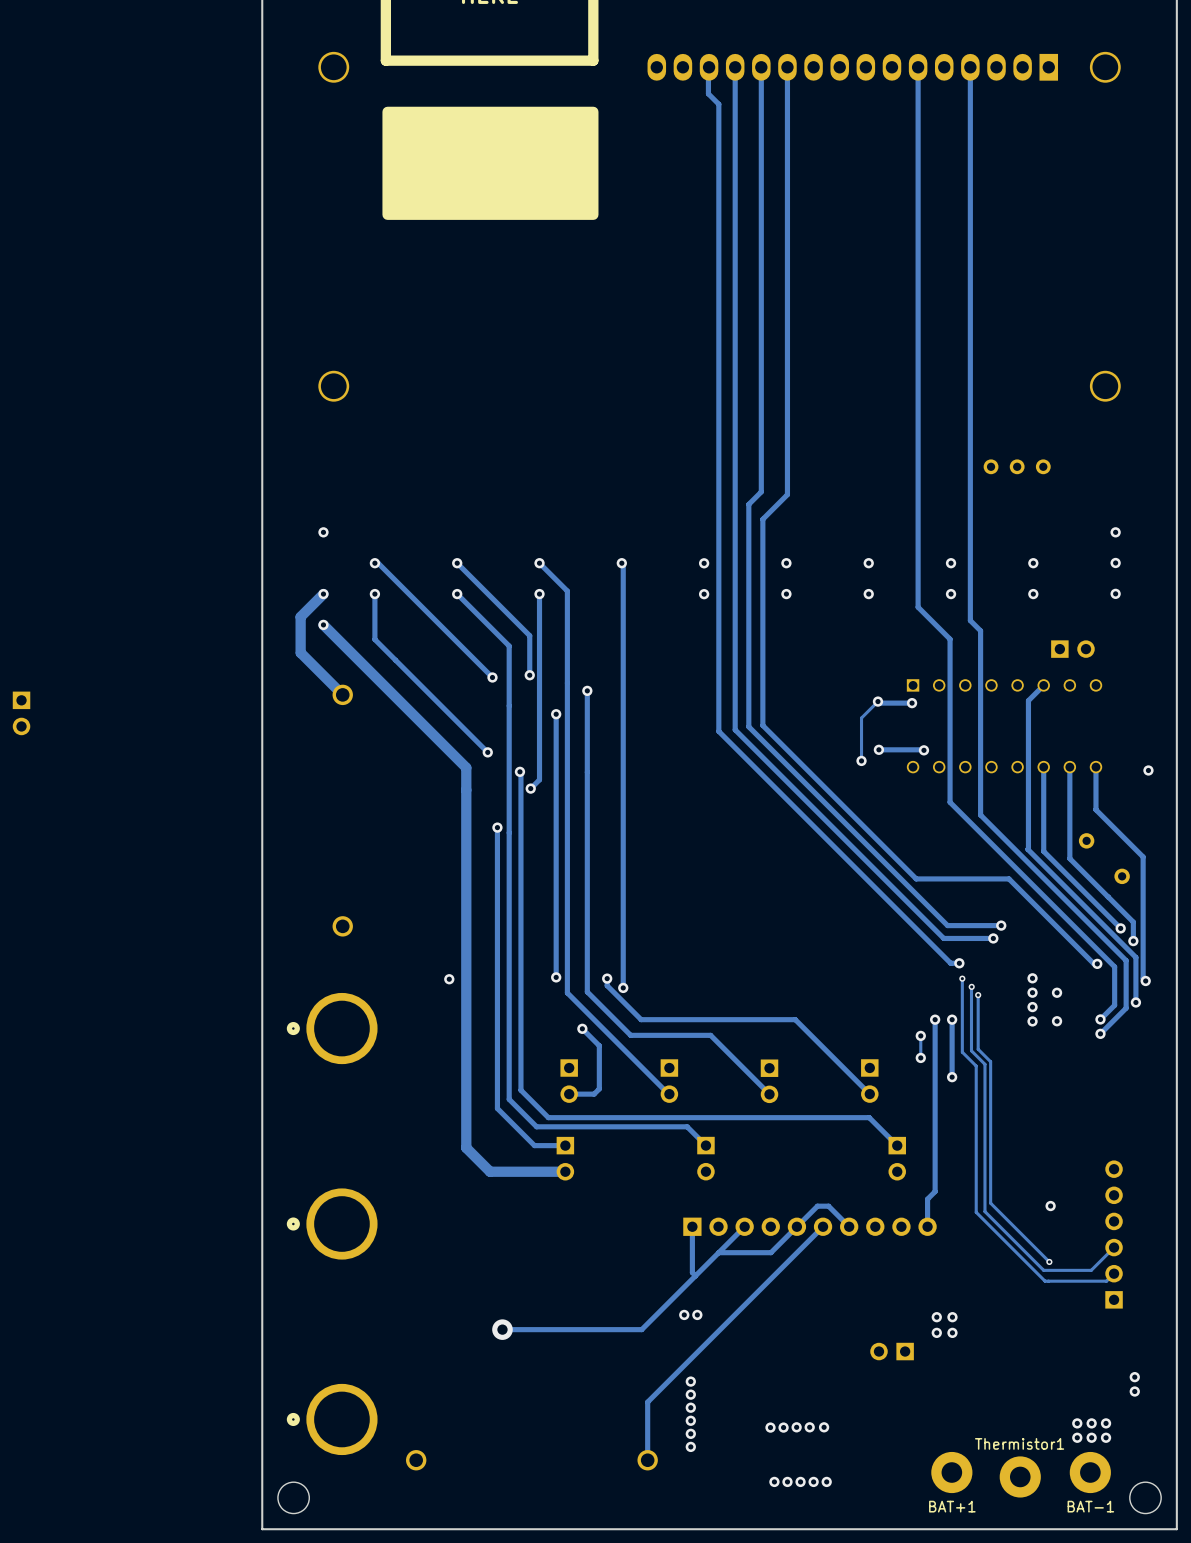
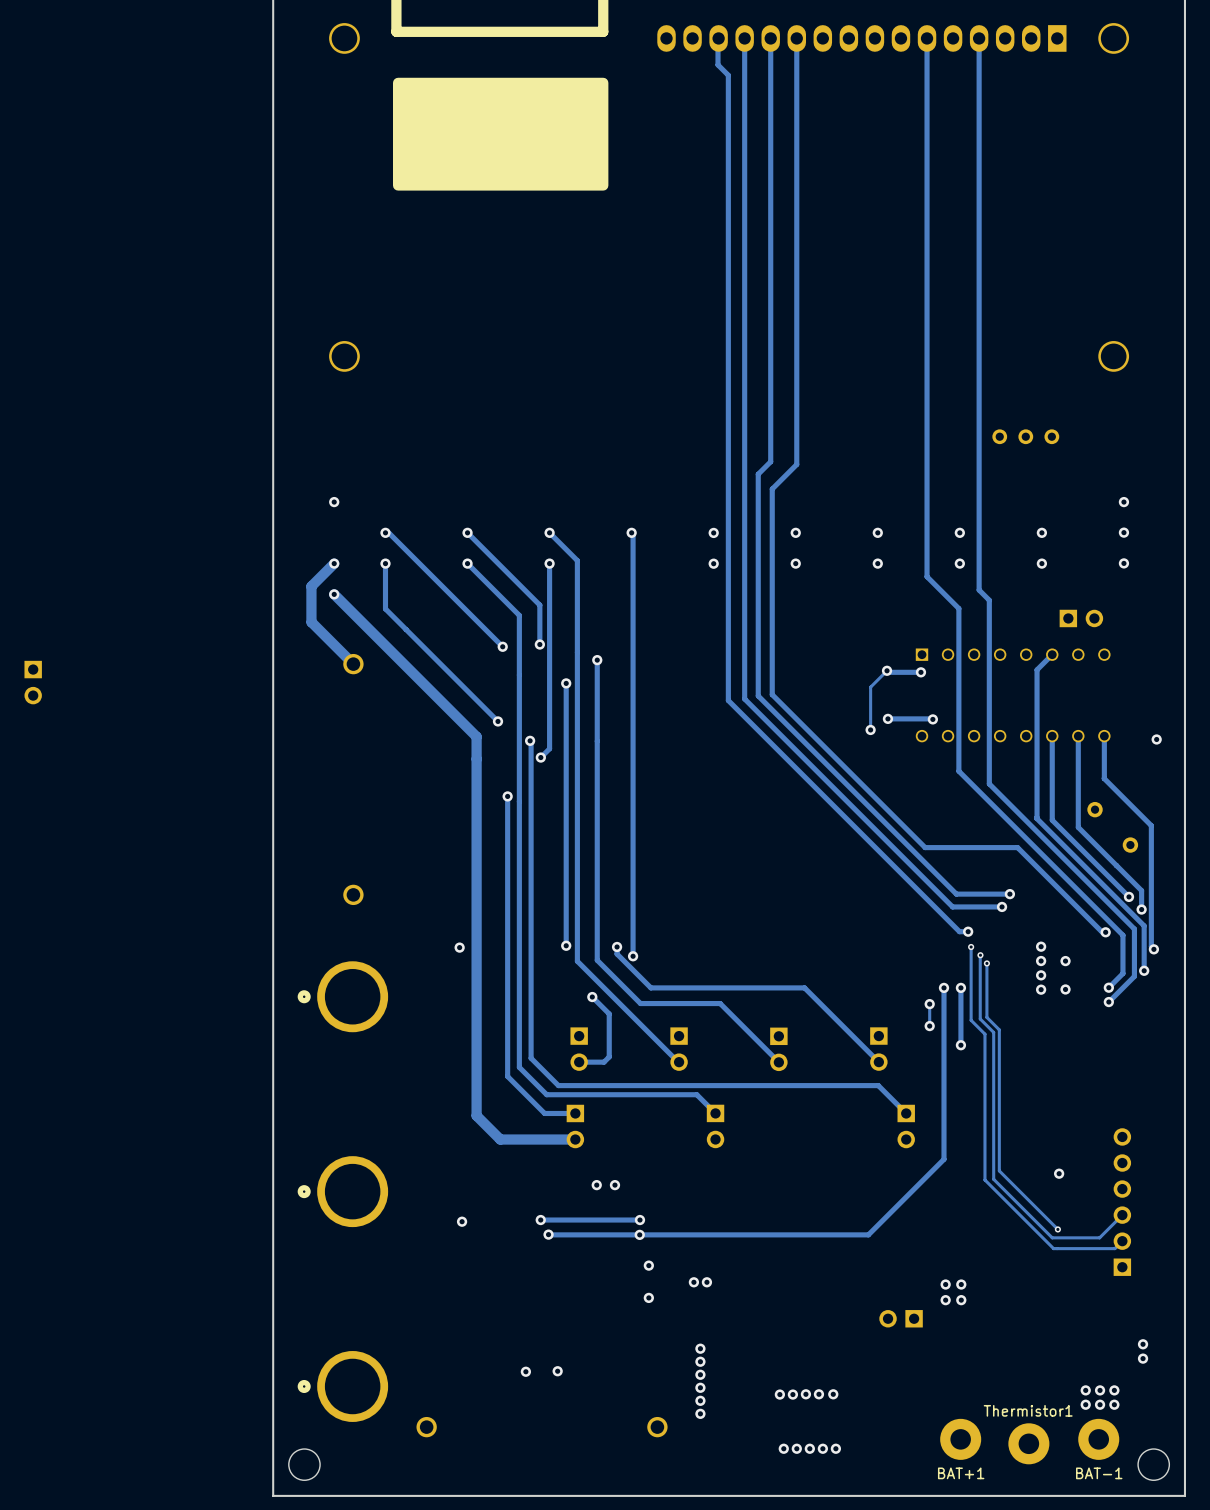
track: (927, 1199) (927, 1226) -> (936, 1166) (868, 1234) (548, 1234)
via: none -> (596, 1185)
via: none -> (614, 1185)
track: (692, 1226) (692, 1272) (695, 1275) -> none
track: (744, 1226) (641, 1329) (502, 1329) -> none
part: (809, 1226) -> none
track: (823, 1226) (647, 1402) (647, 1460) -> none
track: (849, 1226) (828, 1206) (817, 1206) (770, 1252) (718, 1252) -> none
via: none -> (540, 1220)
track: none -> (639, 1220) (540, 1220)
via: none -> (639, 1220)
via: none -> (462, 1221)
via: none -> (548, 1234)
via: none -> (639, 1234)
via: none -> (648, 1265)
via: (502, 1329) -> none
via: none -> (648, 1297)
via: none -> (525, 1371)
via: none -> (557, 1371)

